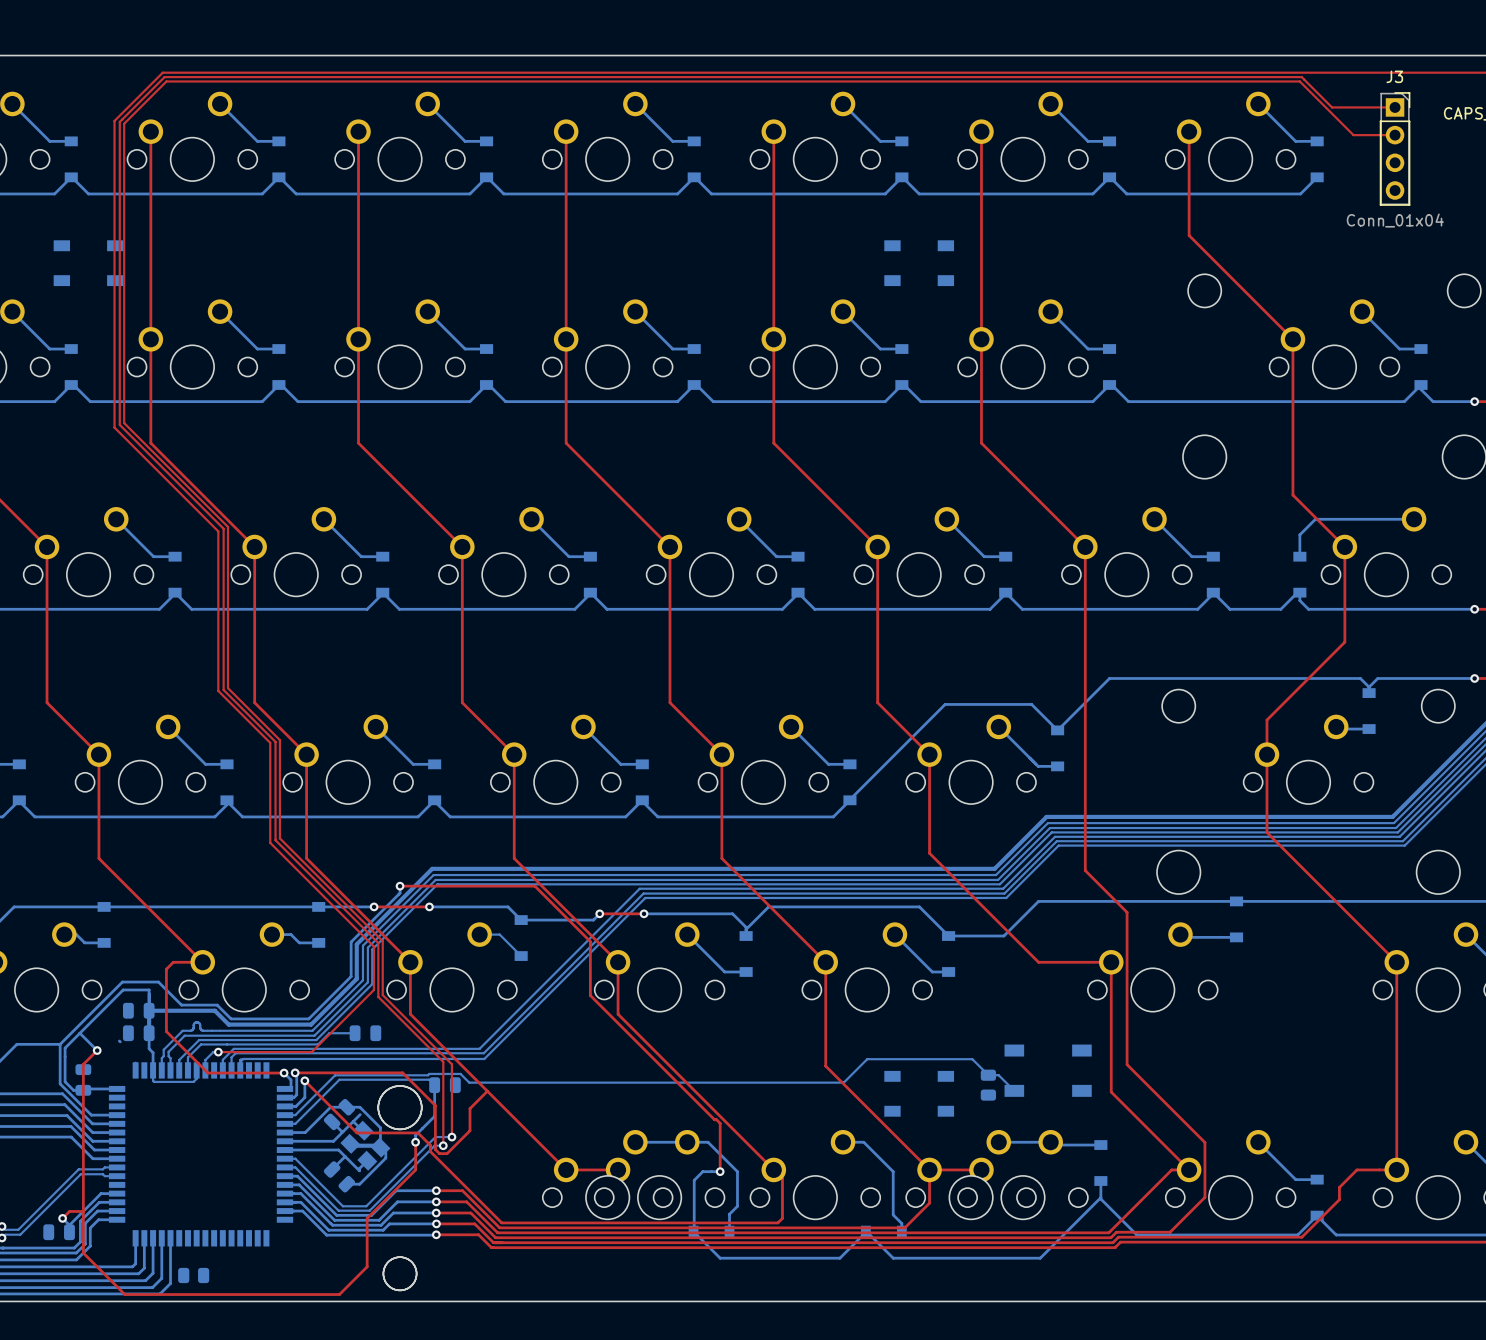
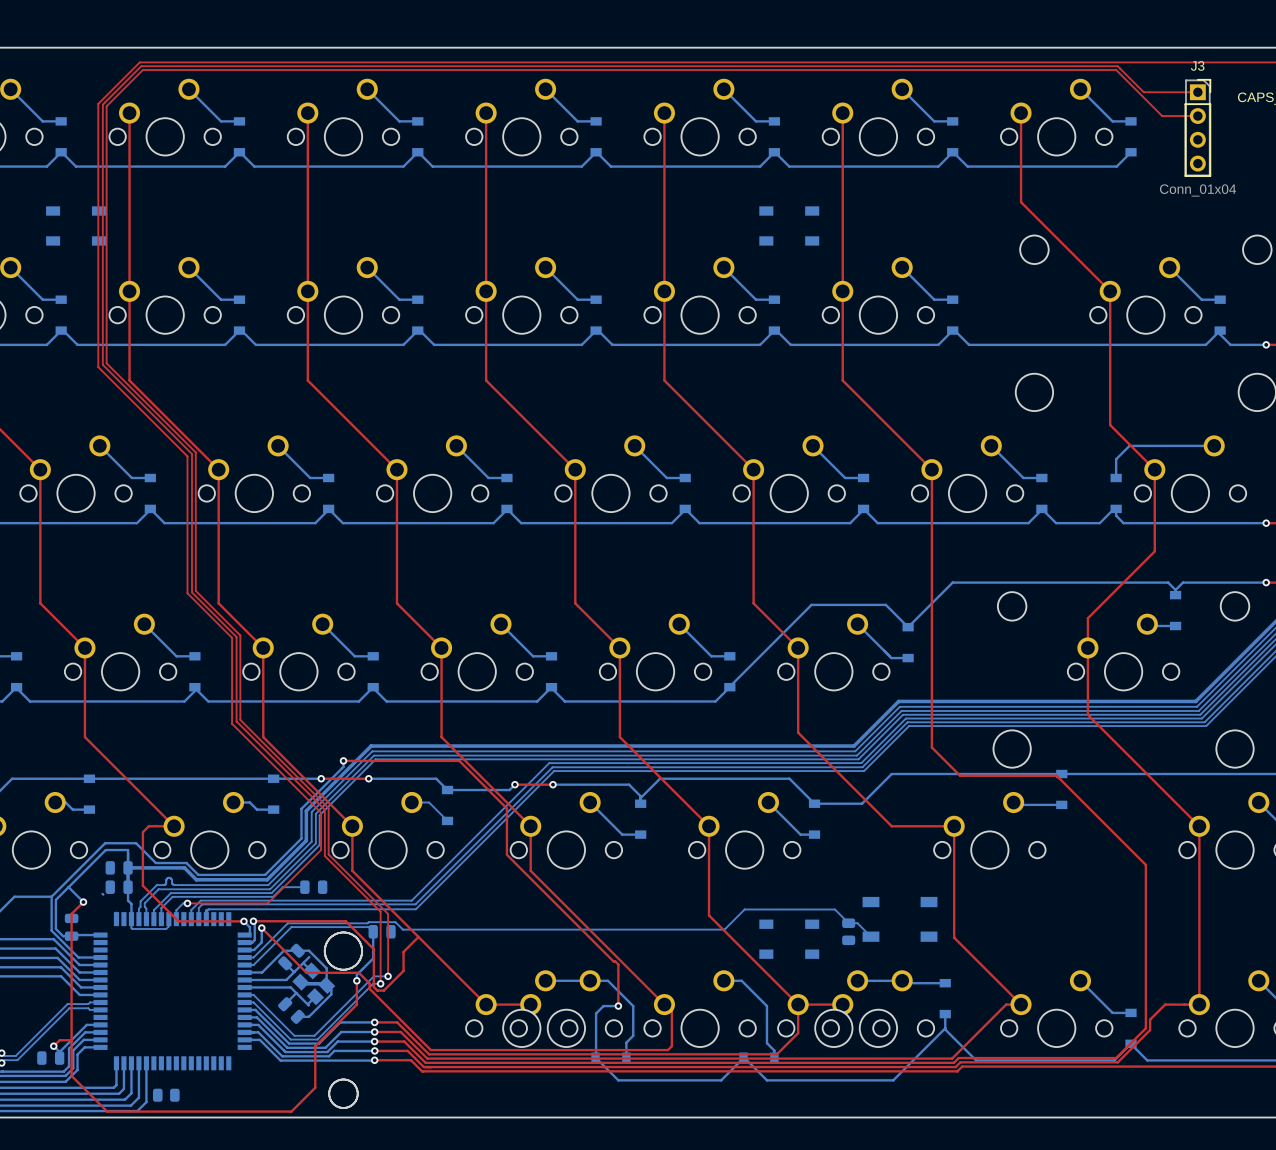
top track: (1118, 903) (1127, 912) (1127, 1064) (1204, 1142) (1204, 1197) (1170, 1232) -> (960, 775) (1056, 775) (1145, 864) (1145, 1028) (1116, 1058) (1004, 1058)

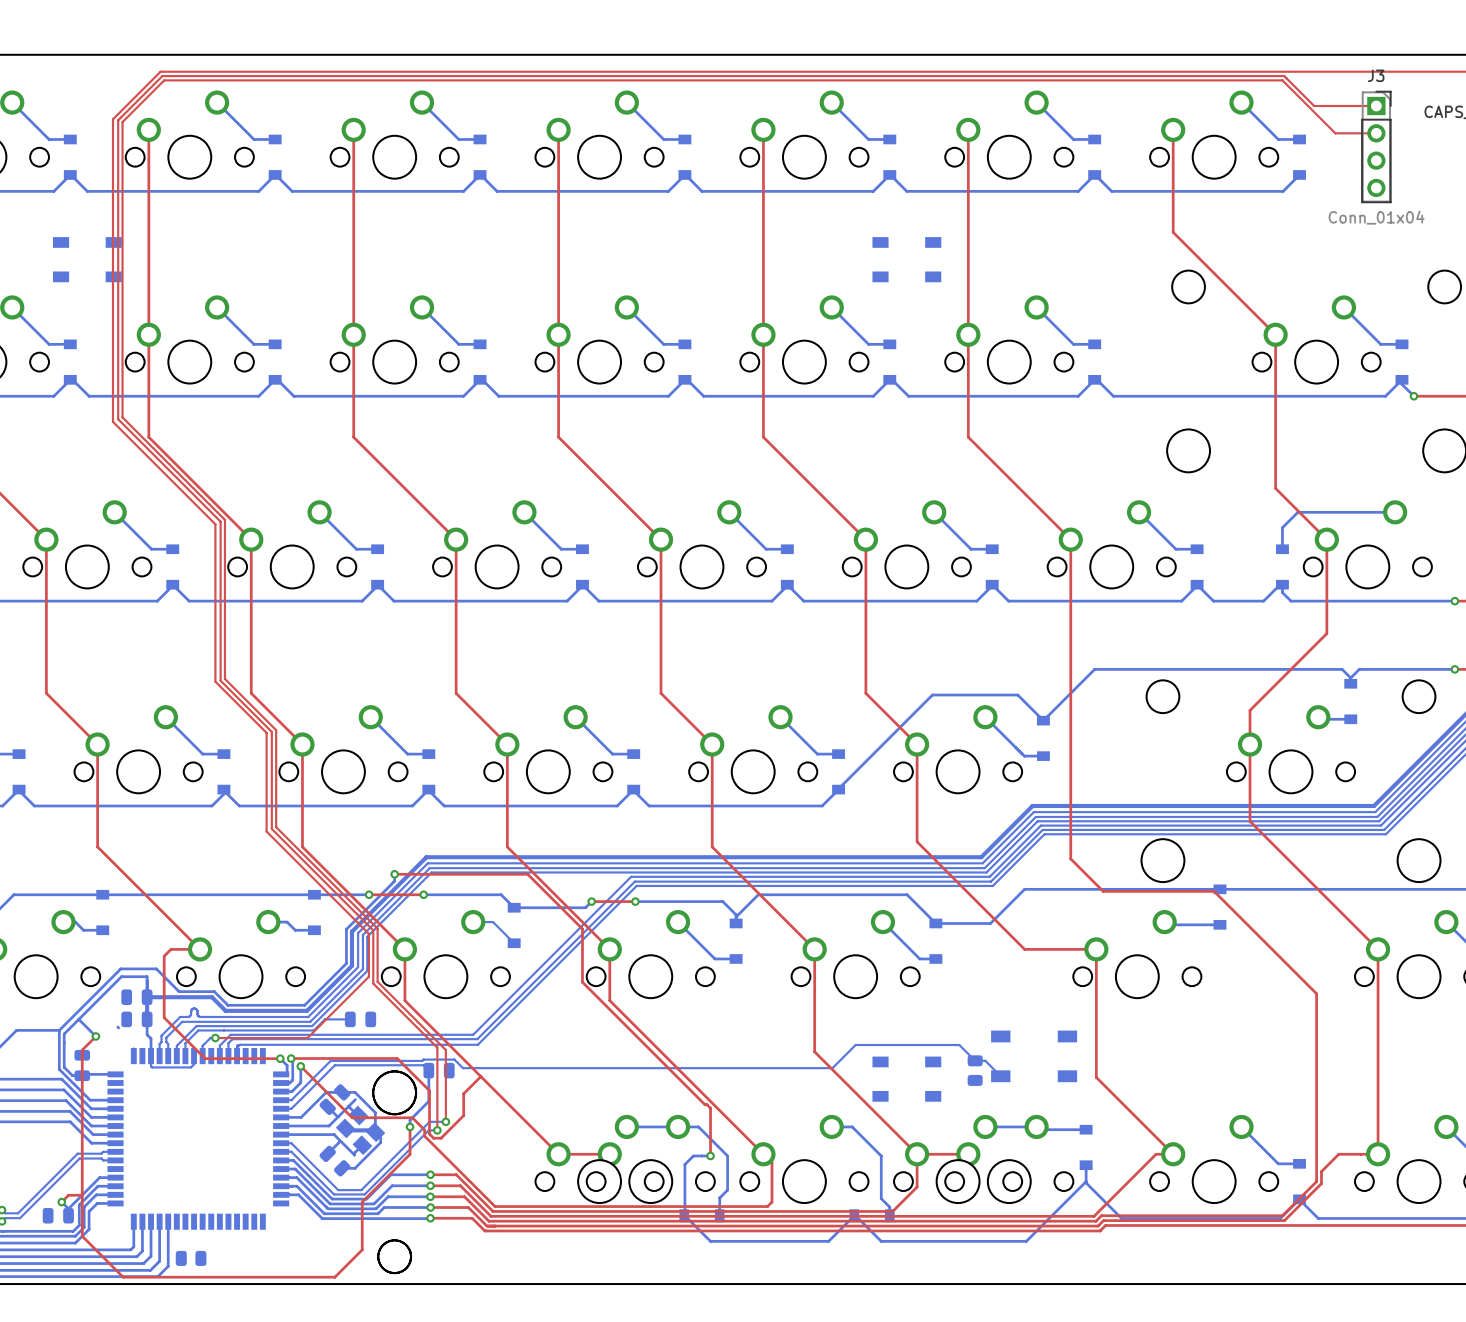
bottom track: (1230, 344) (1266, 344) -> none
top track: none -> (1413, 396) (1454, 396)
via position: (1266, 344) -> (1413, 396)

